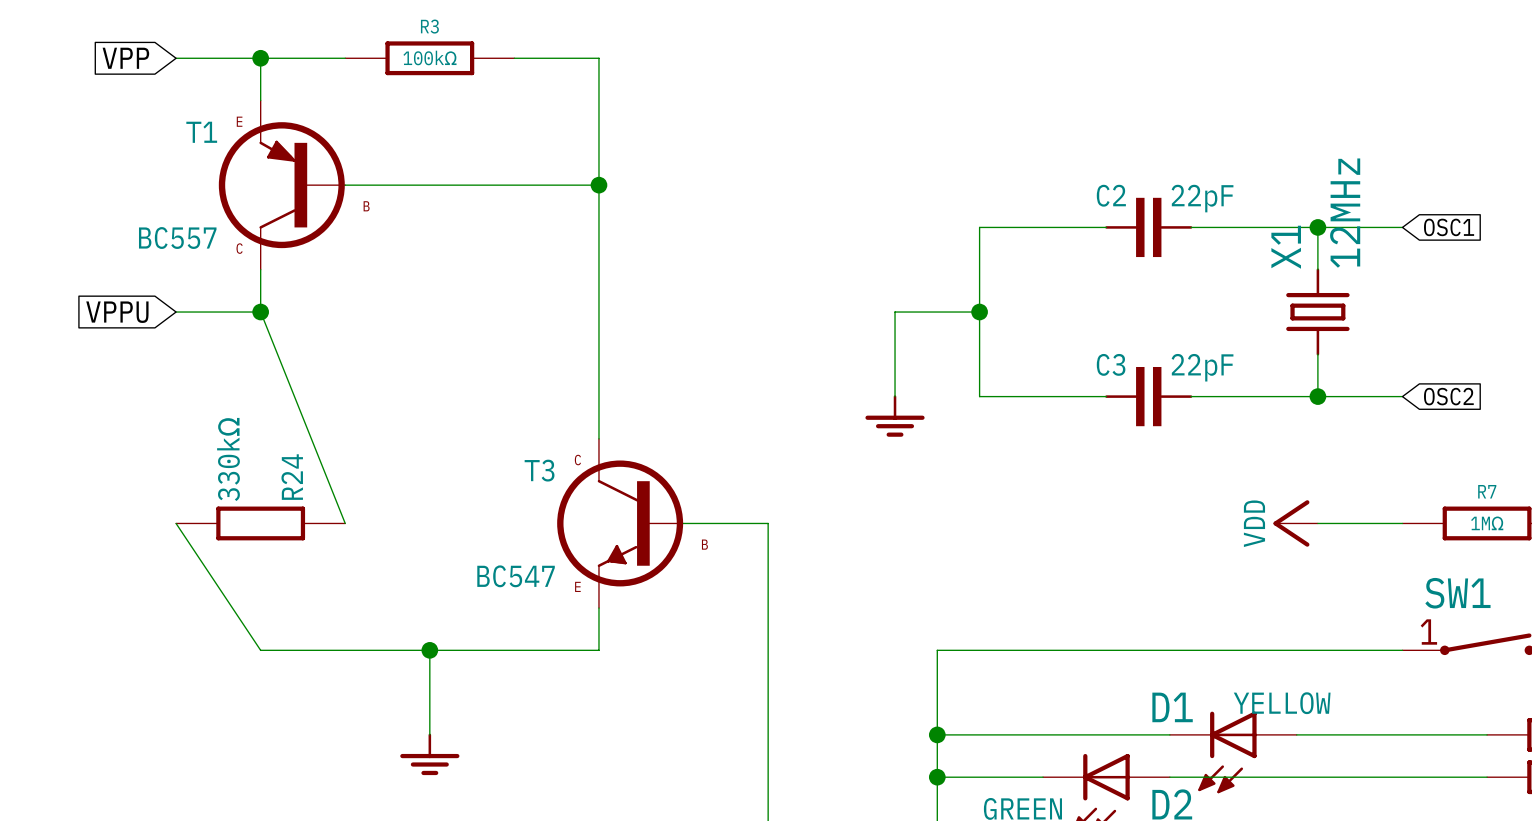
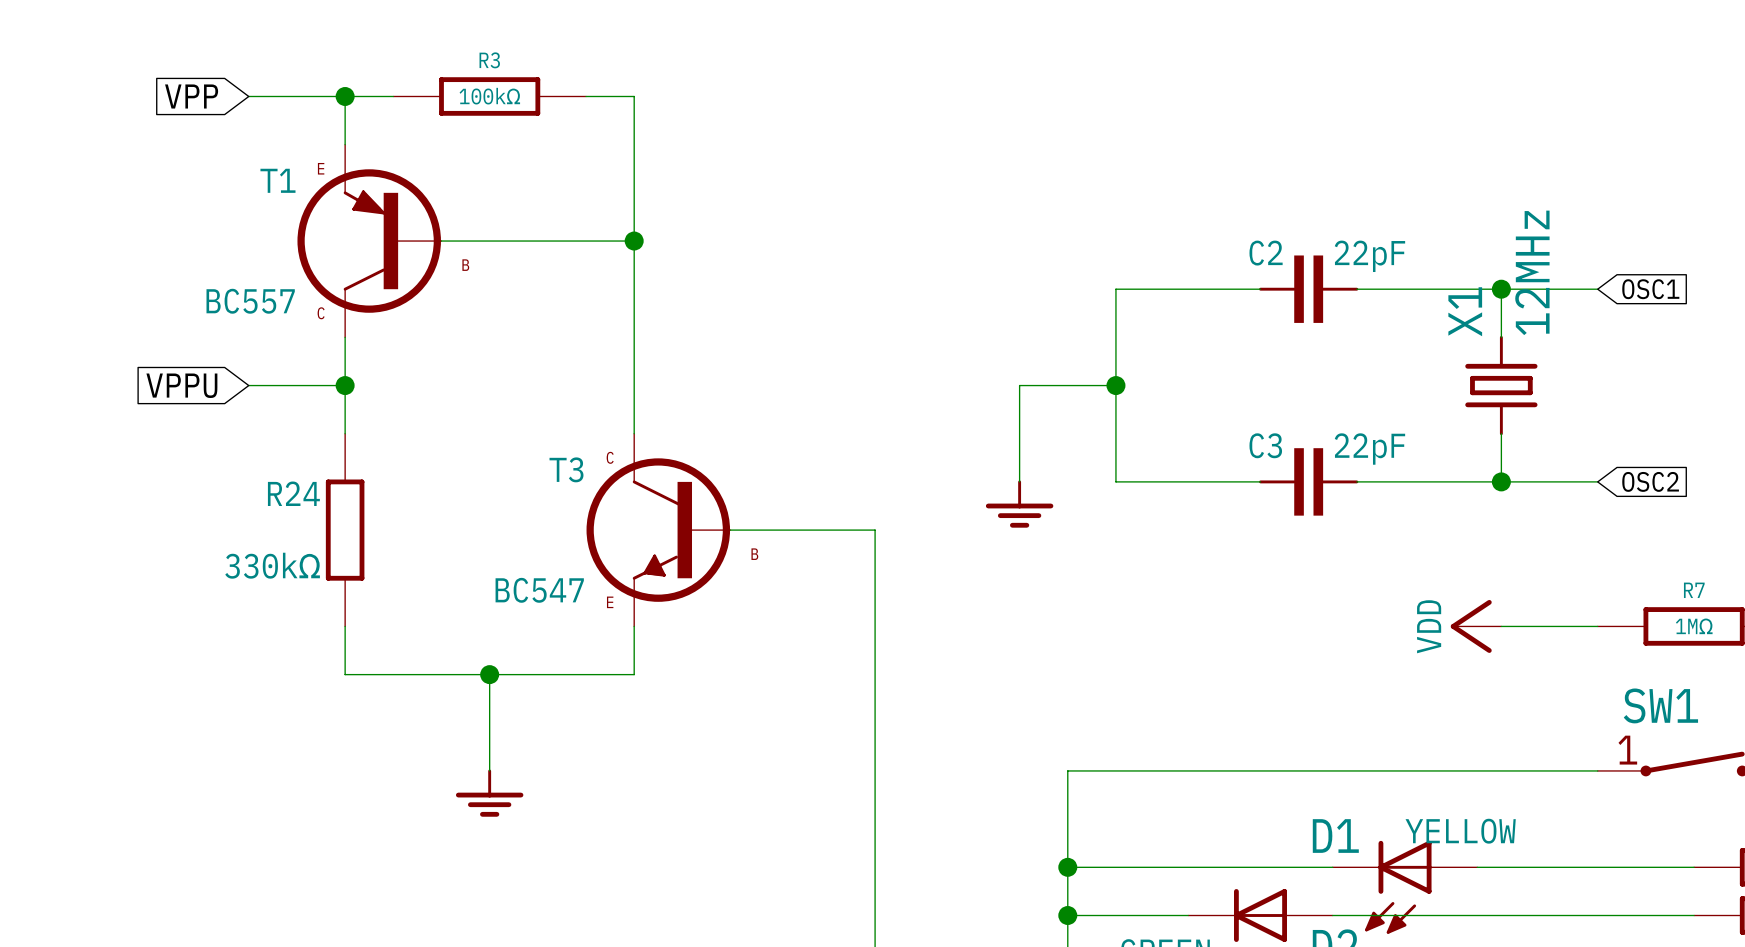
global label position: VPP (125, 58) -> VPP (191, 96)
wire: (176, 58) (218, 58) -> none
wire: (260, 58) (260, 100) -> (345, 96) (345, 144)
junction position: (260, 58) -> (345, 96)
wire: (556, 58) (598, 58) (598, 438) -> (634, 96) (634, 433)
T1 position: (282, 185) -> (369, 241)
wire: (556, 185) (598, 185) -> none
junction position: (598, 185) -> (634, 241)
wire: (260, 269) (260, 312) (345, 523) -> none
wire: none -> (345, 337) (345, 433)
global label position: VPPU (117, 312) -> VPPU (181, 385)
wire: (176, 312) (218, 312) -> (296, 385) (345, 385)
junction position: (260, 312) -> (345, 385)
R24 value position: 330kΩ (228, 459) -> 330kΩ (272, 565)
R24 name position: R24 (292, 477) -> R24 (293, 493)
wire: (176, 523) (260, 650) (598, 650) (598, 608) -> none
R24 rotation: 0° (260, 523) -> 90° clockwise (345, 530)
wire: none -> (345, 626) (345, 674) (634, 674) (634, 626)
T3 position: (620, 523) -> (658, 530)
wire: (683, 523) (768, 523) -> (730, 530) (875, 530) (875, 626)
wire: (429, 650) (429, 734) -> (489, 770) (489, 674)
junction position: (429, 650) -> (489, 674)
power symbol position: (429, 754) -> (489, 793)

